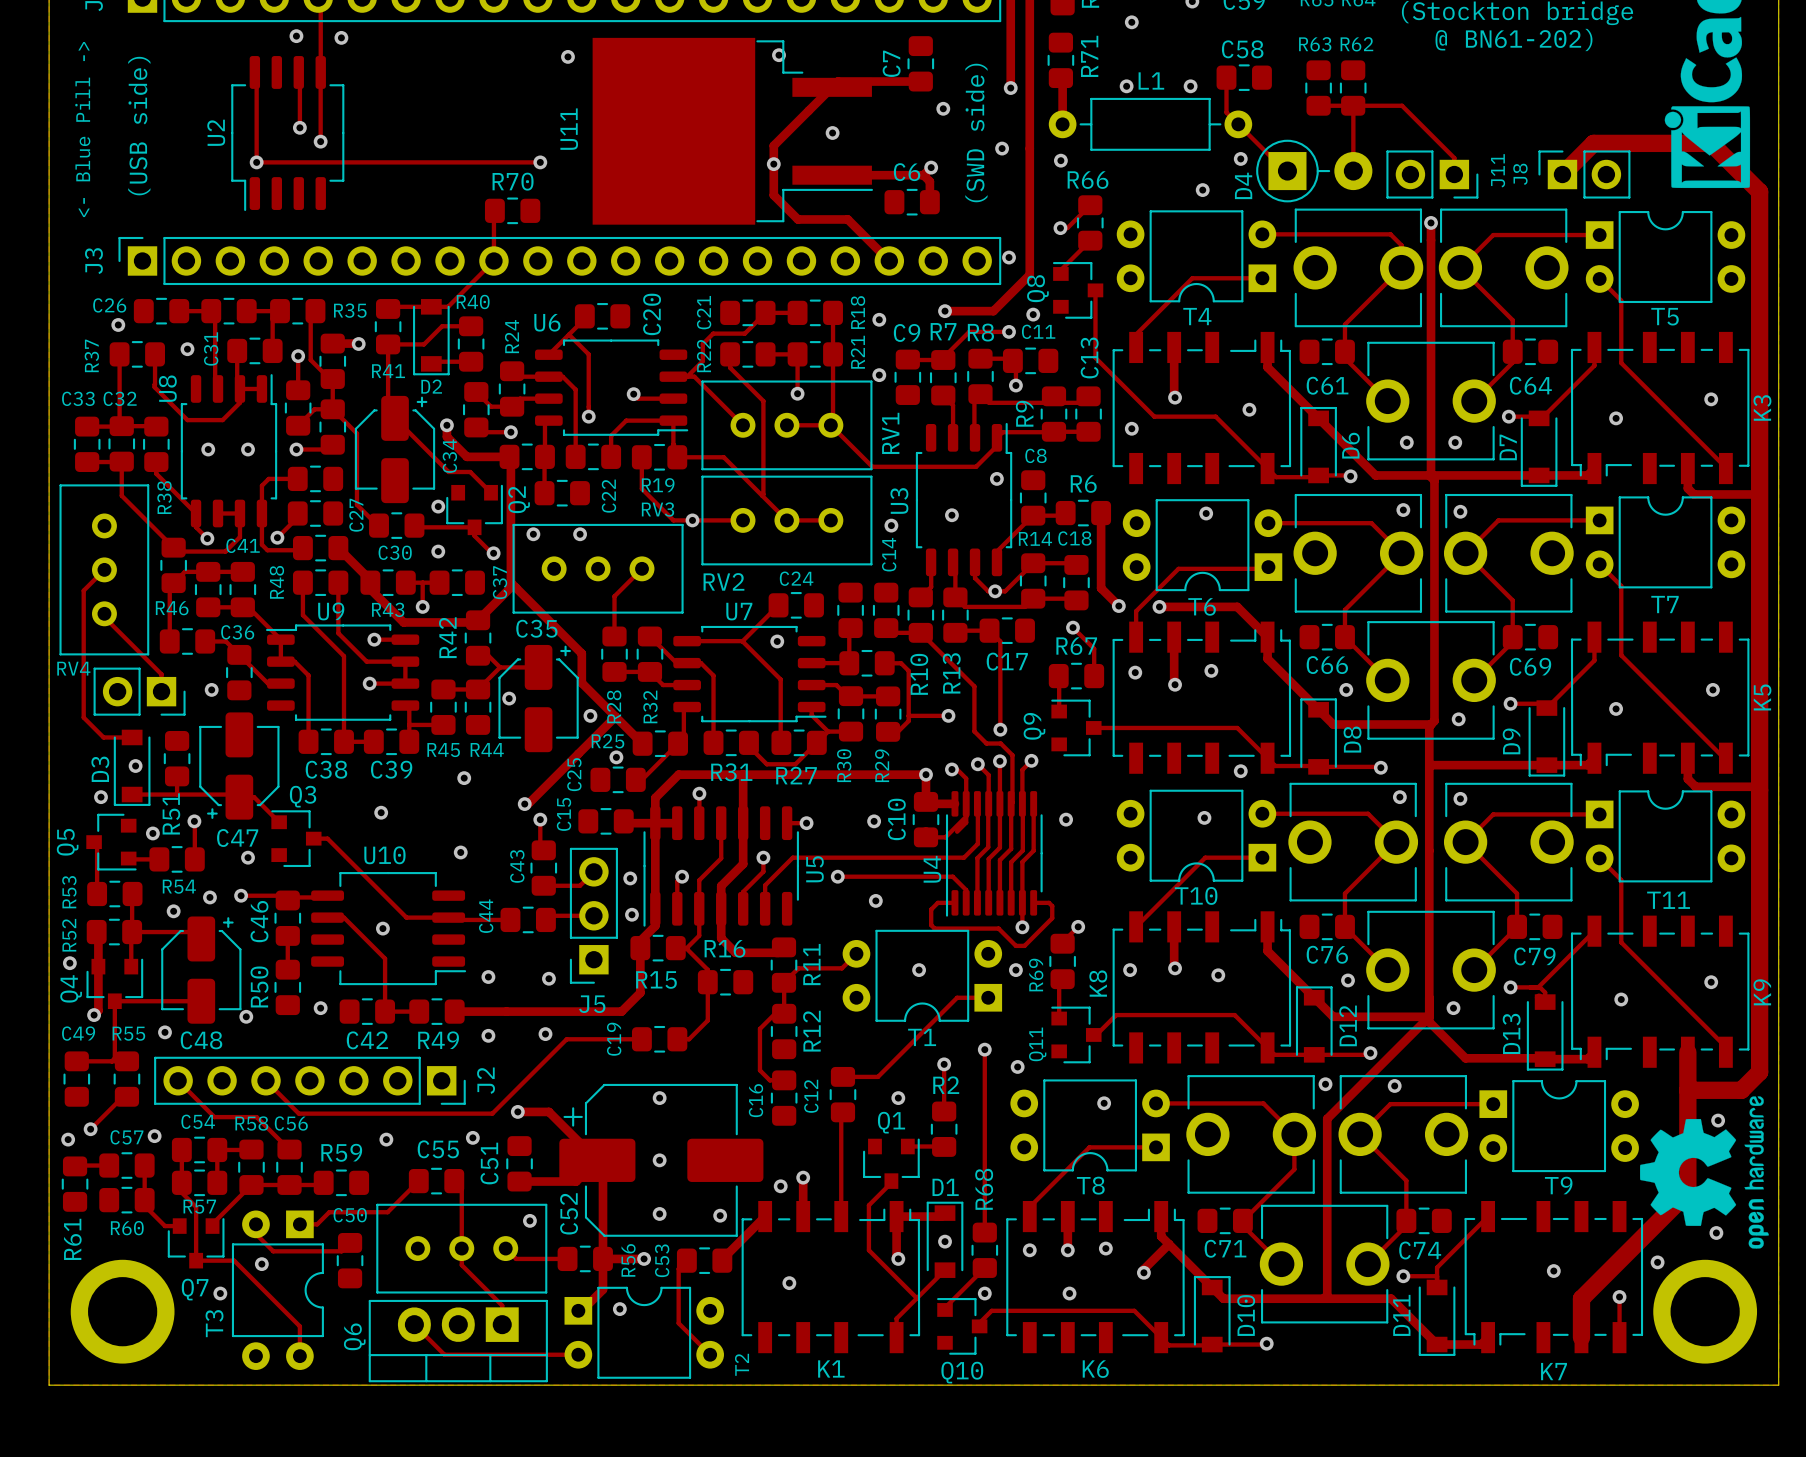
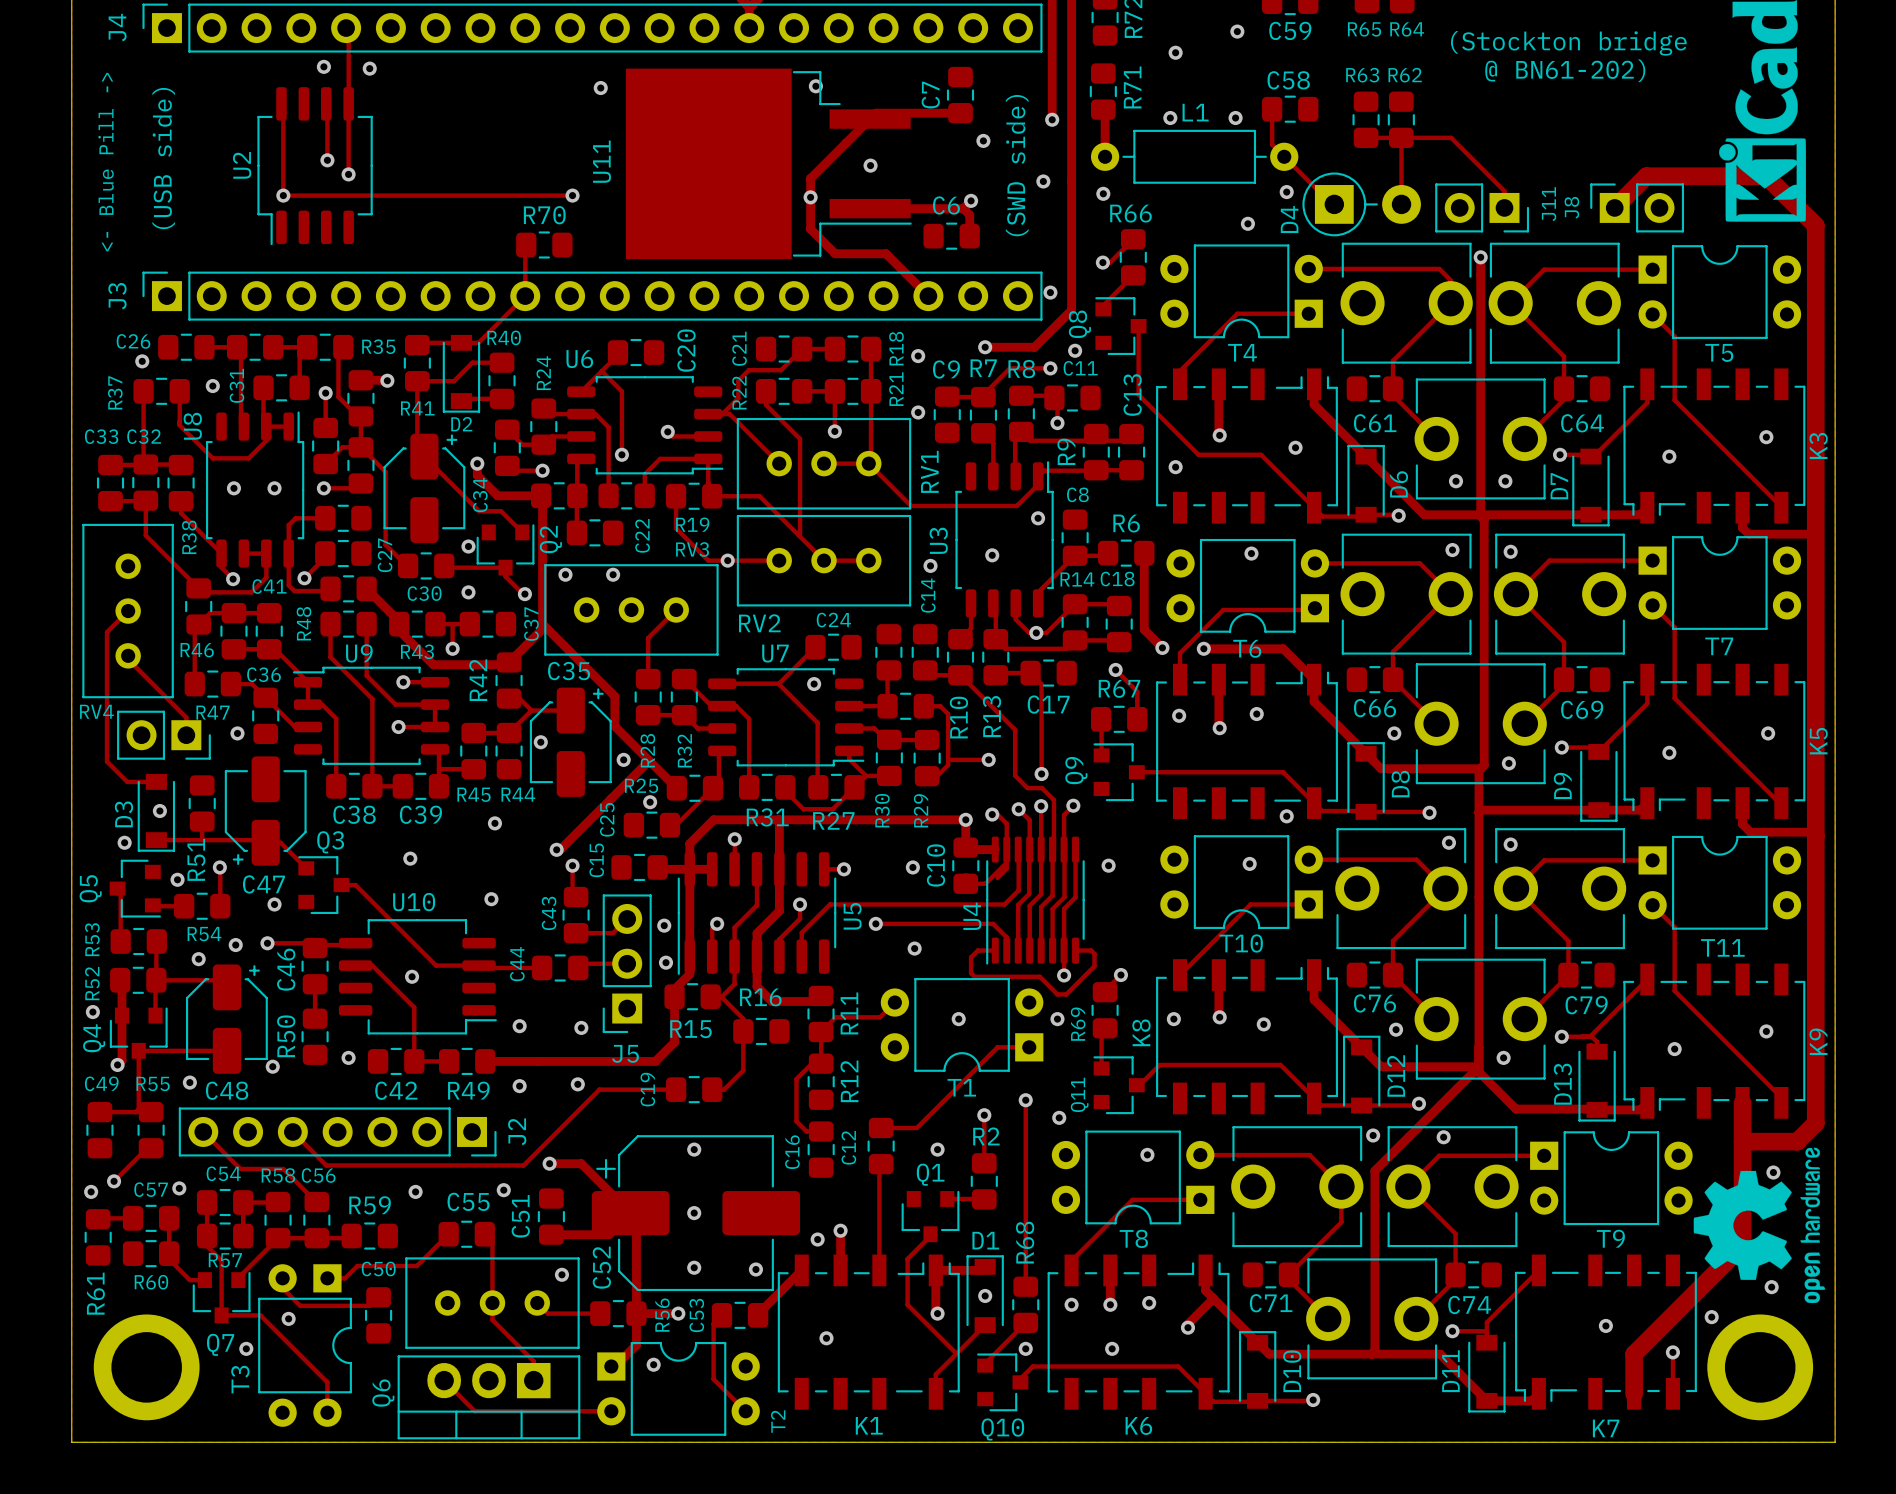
R47 name: none -> R47 (213, 712)

